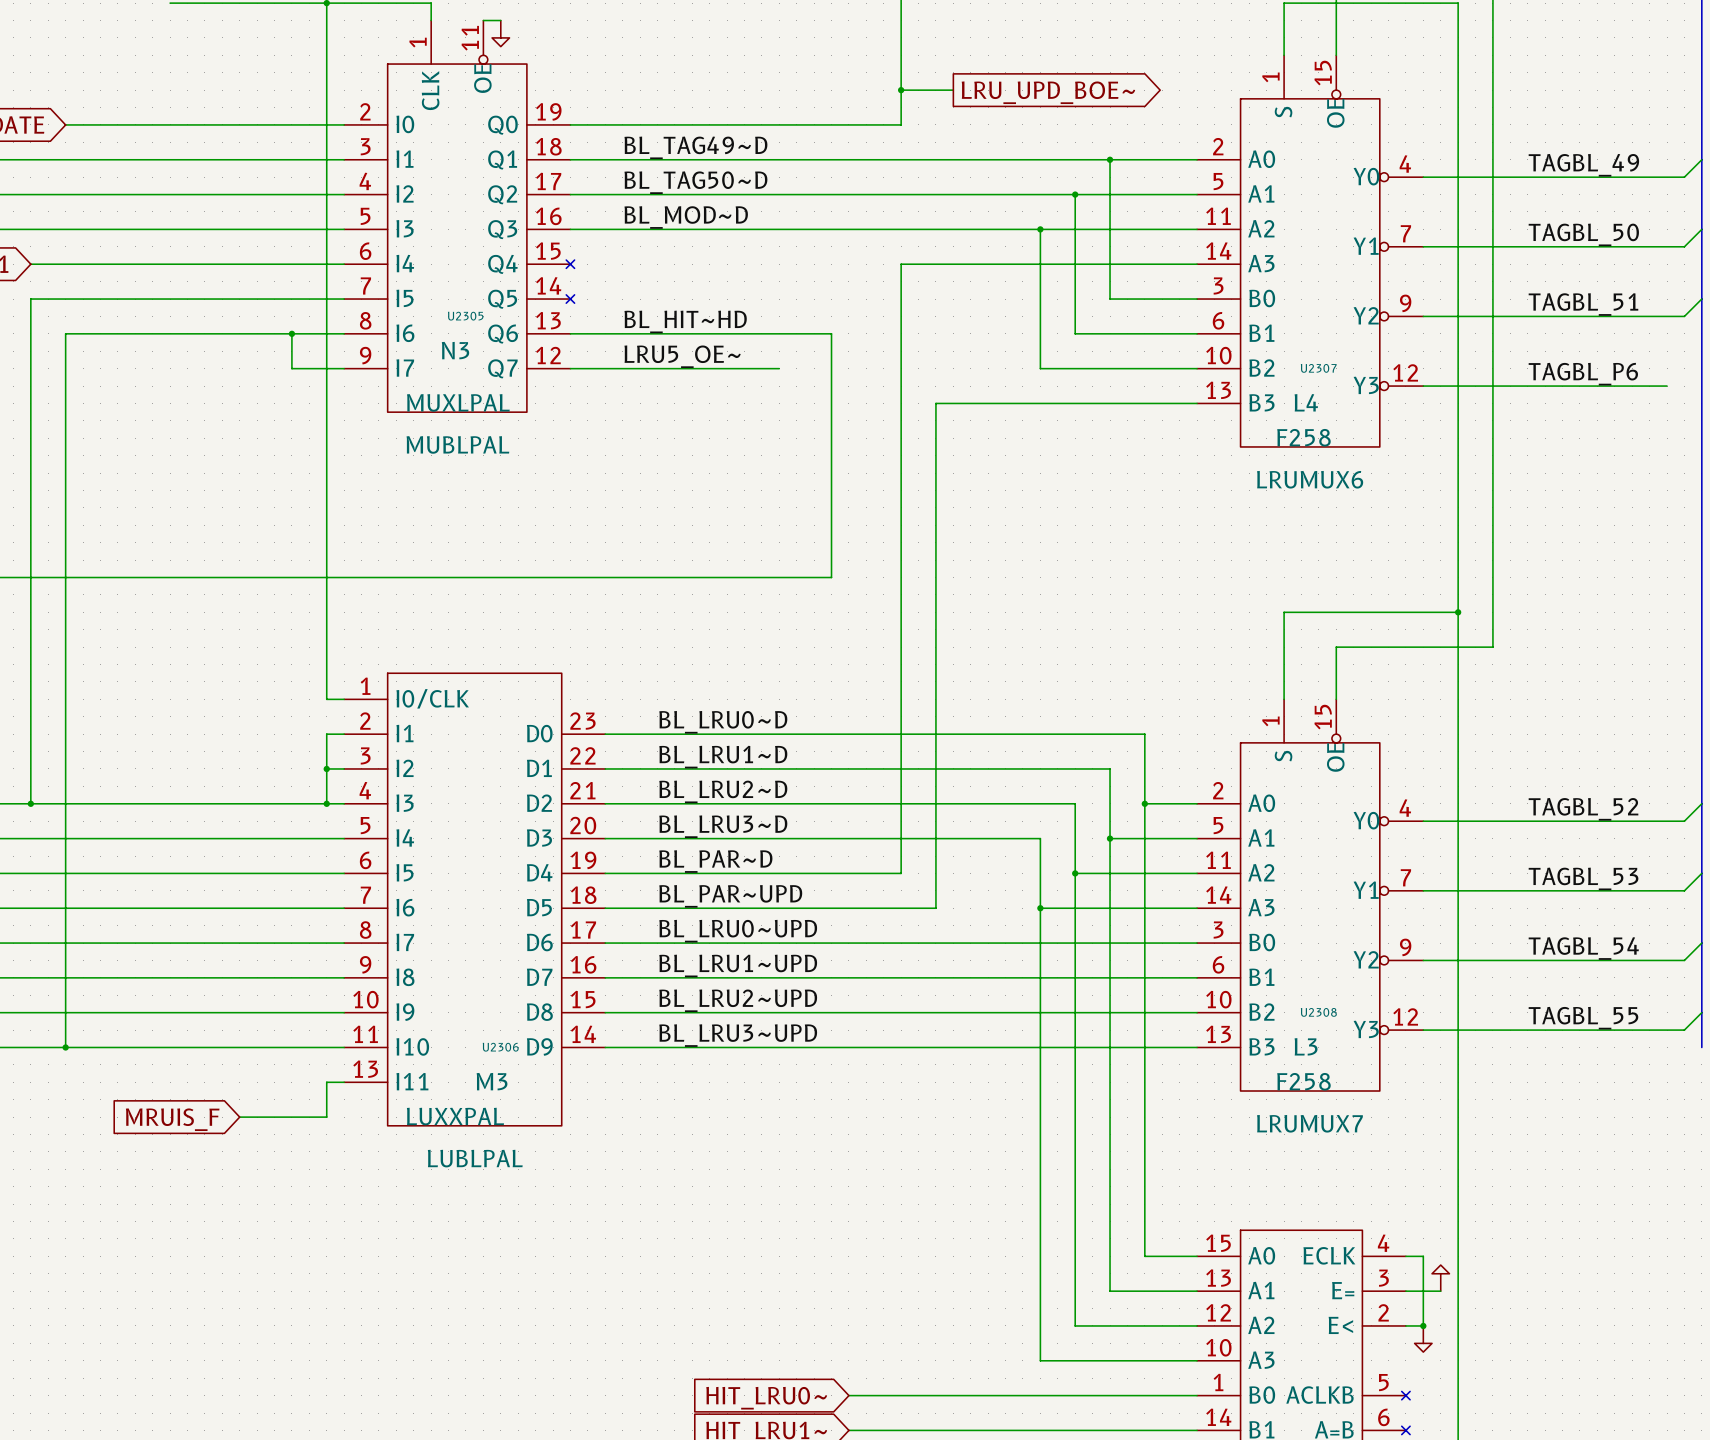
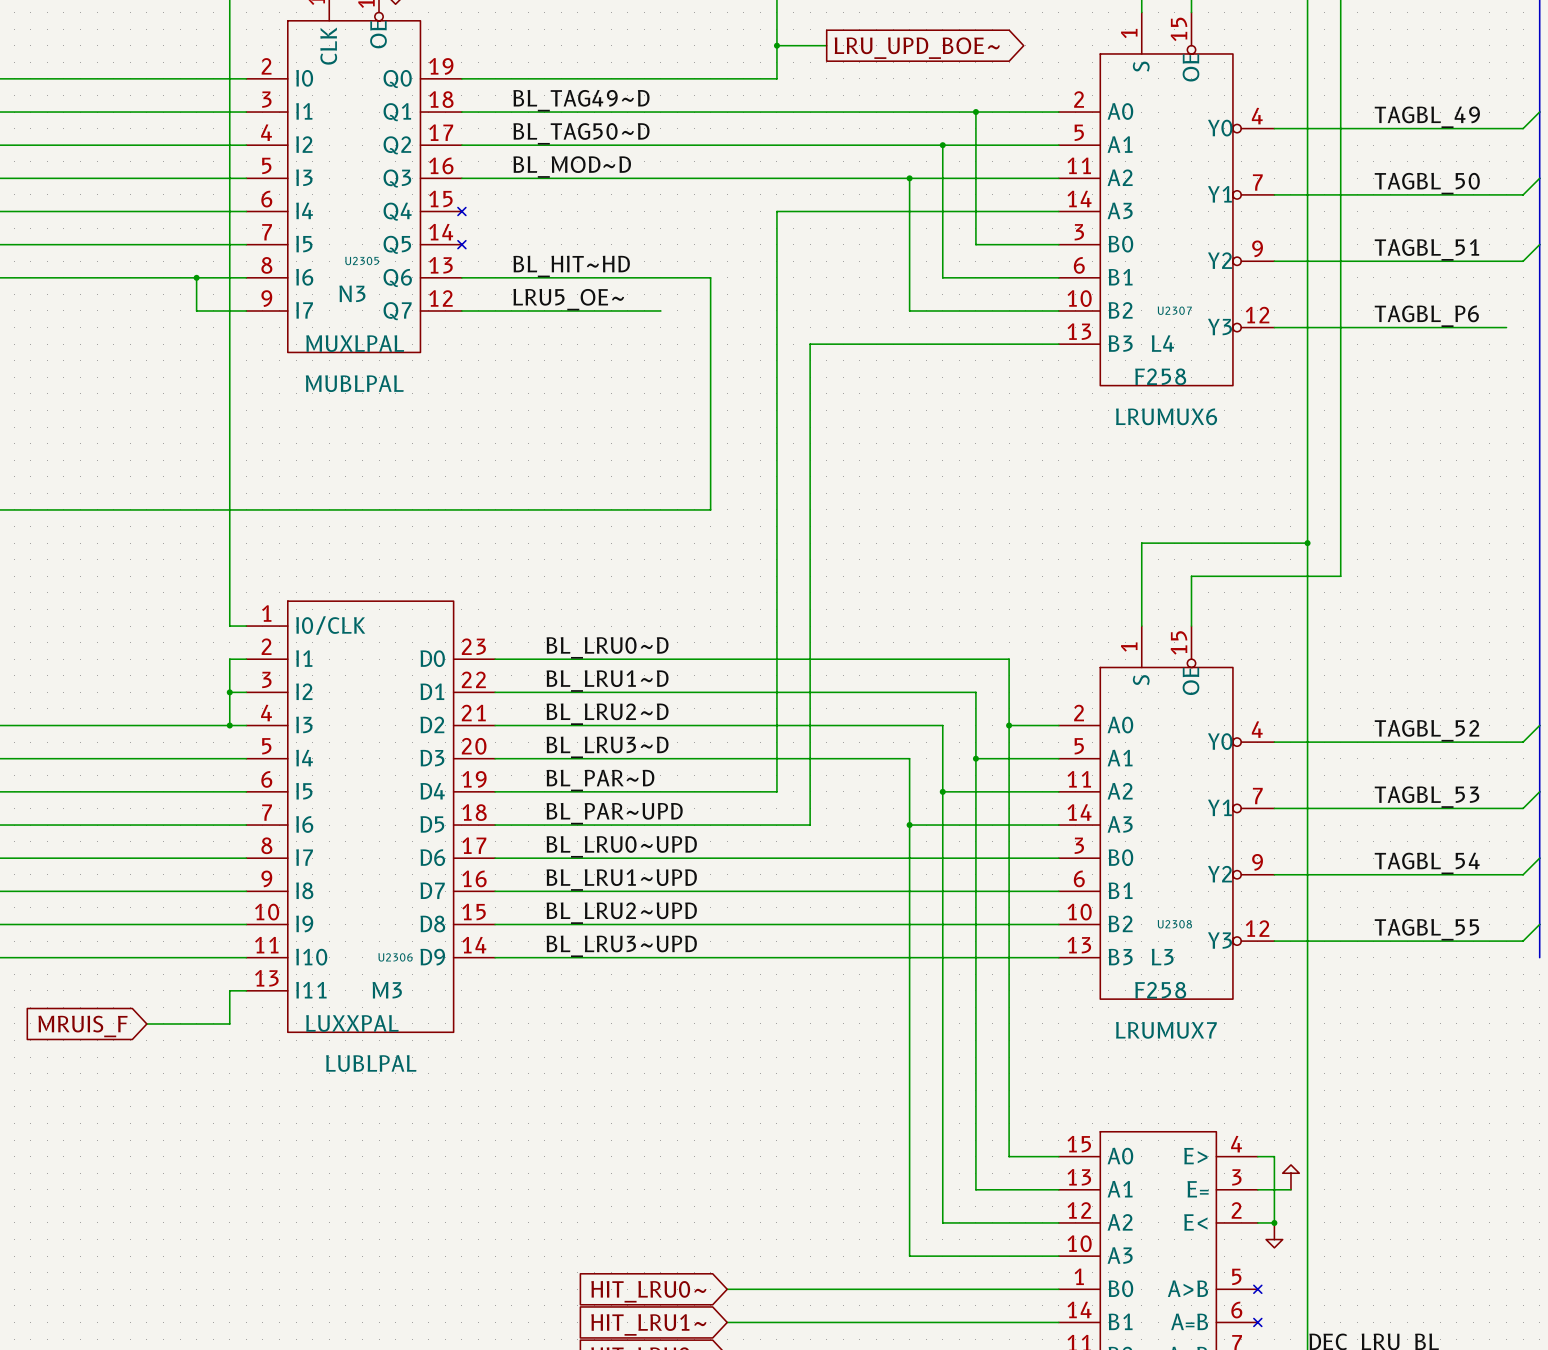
part pin name: ECLK (1329, 1255) -> E> (1195, 1156)
part pin name: ACLKB (1319, 1395) -> A>B (1187, 1288)

